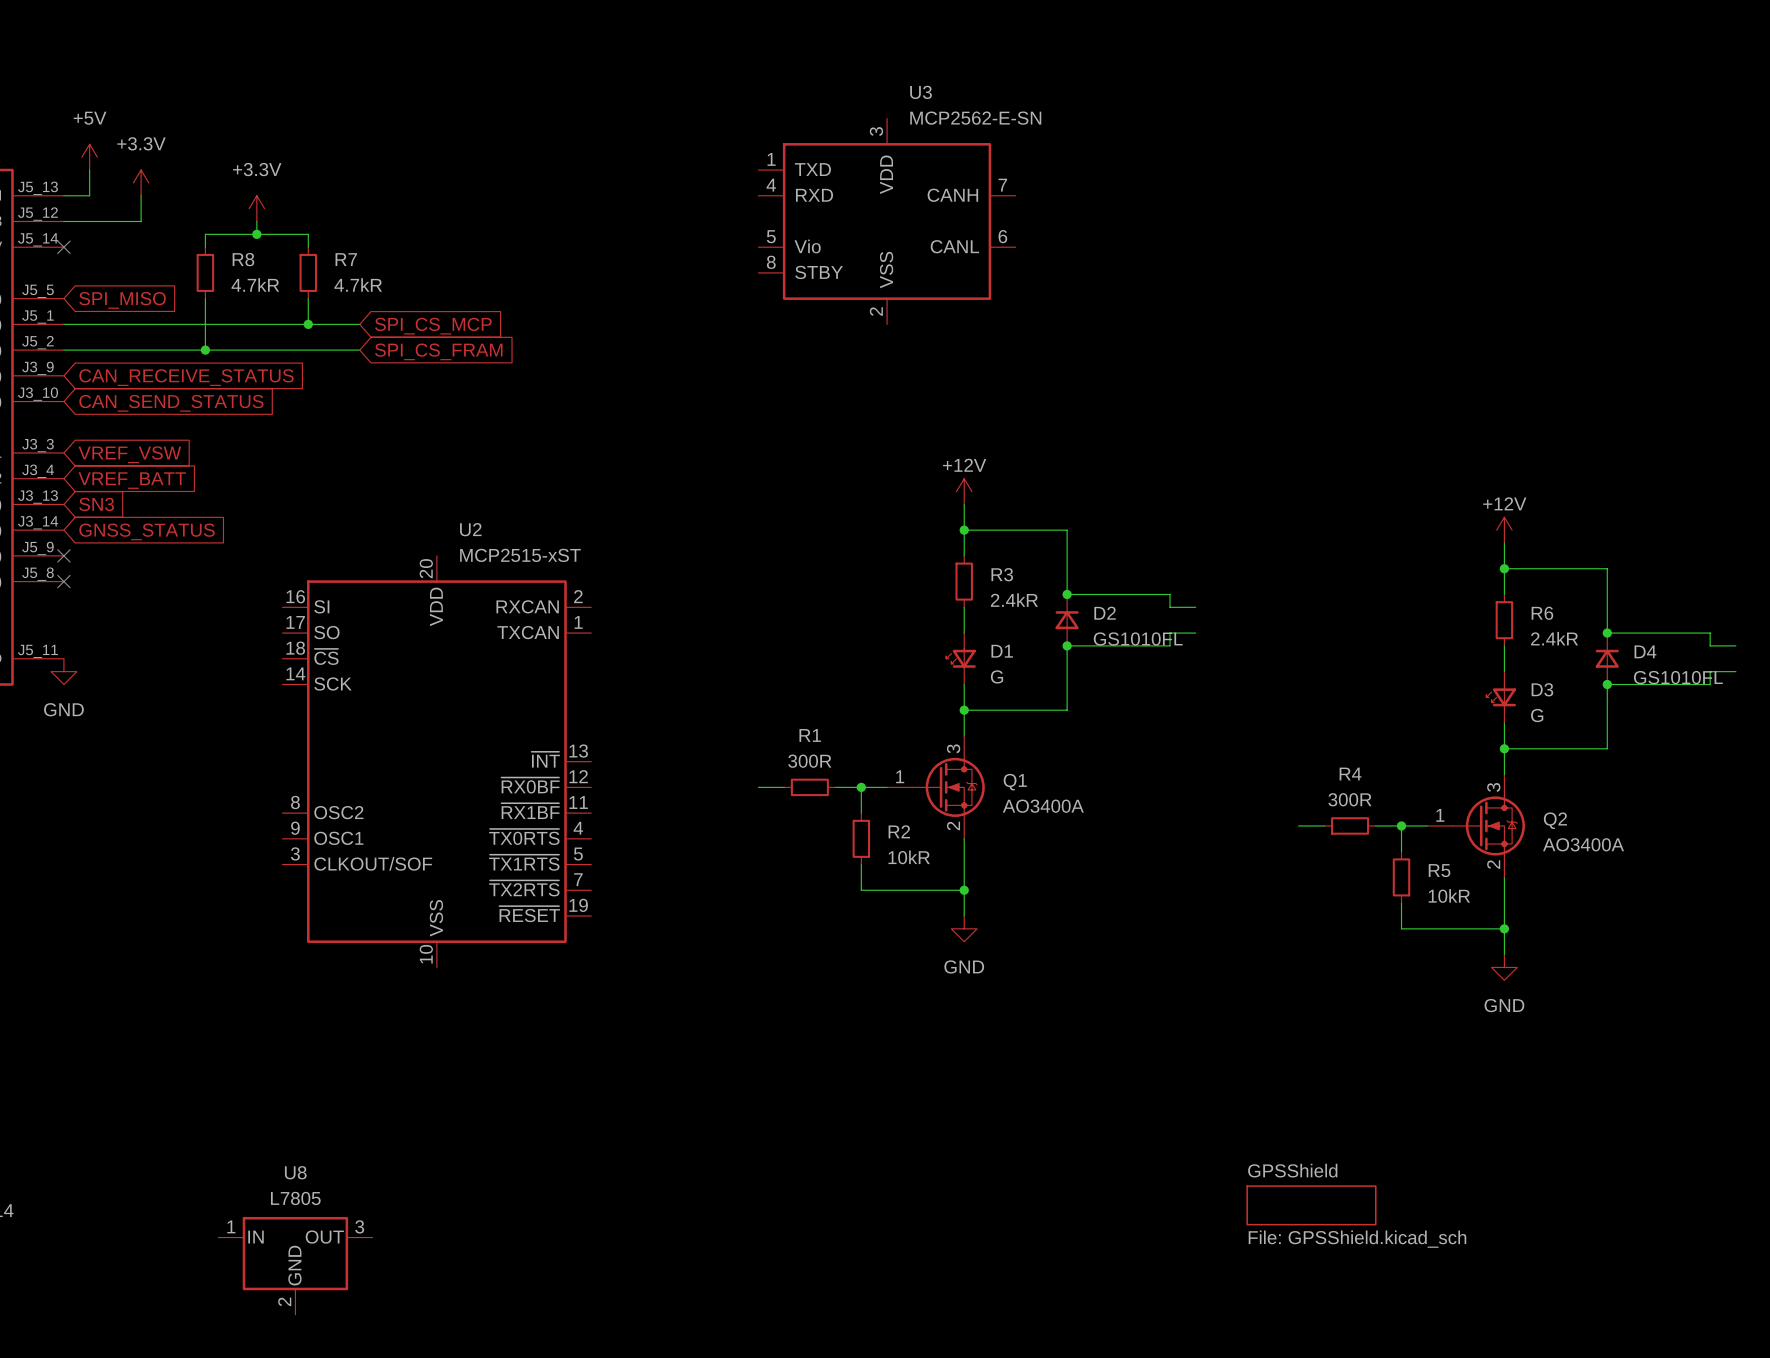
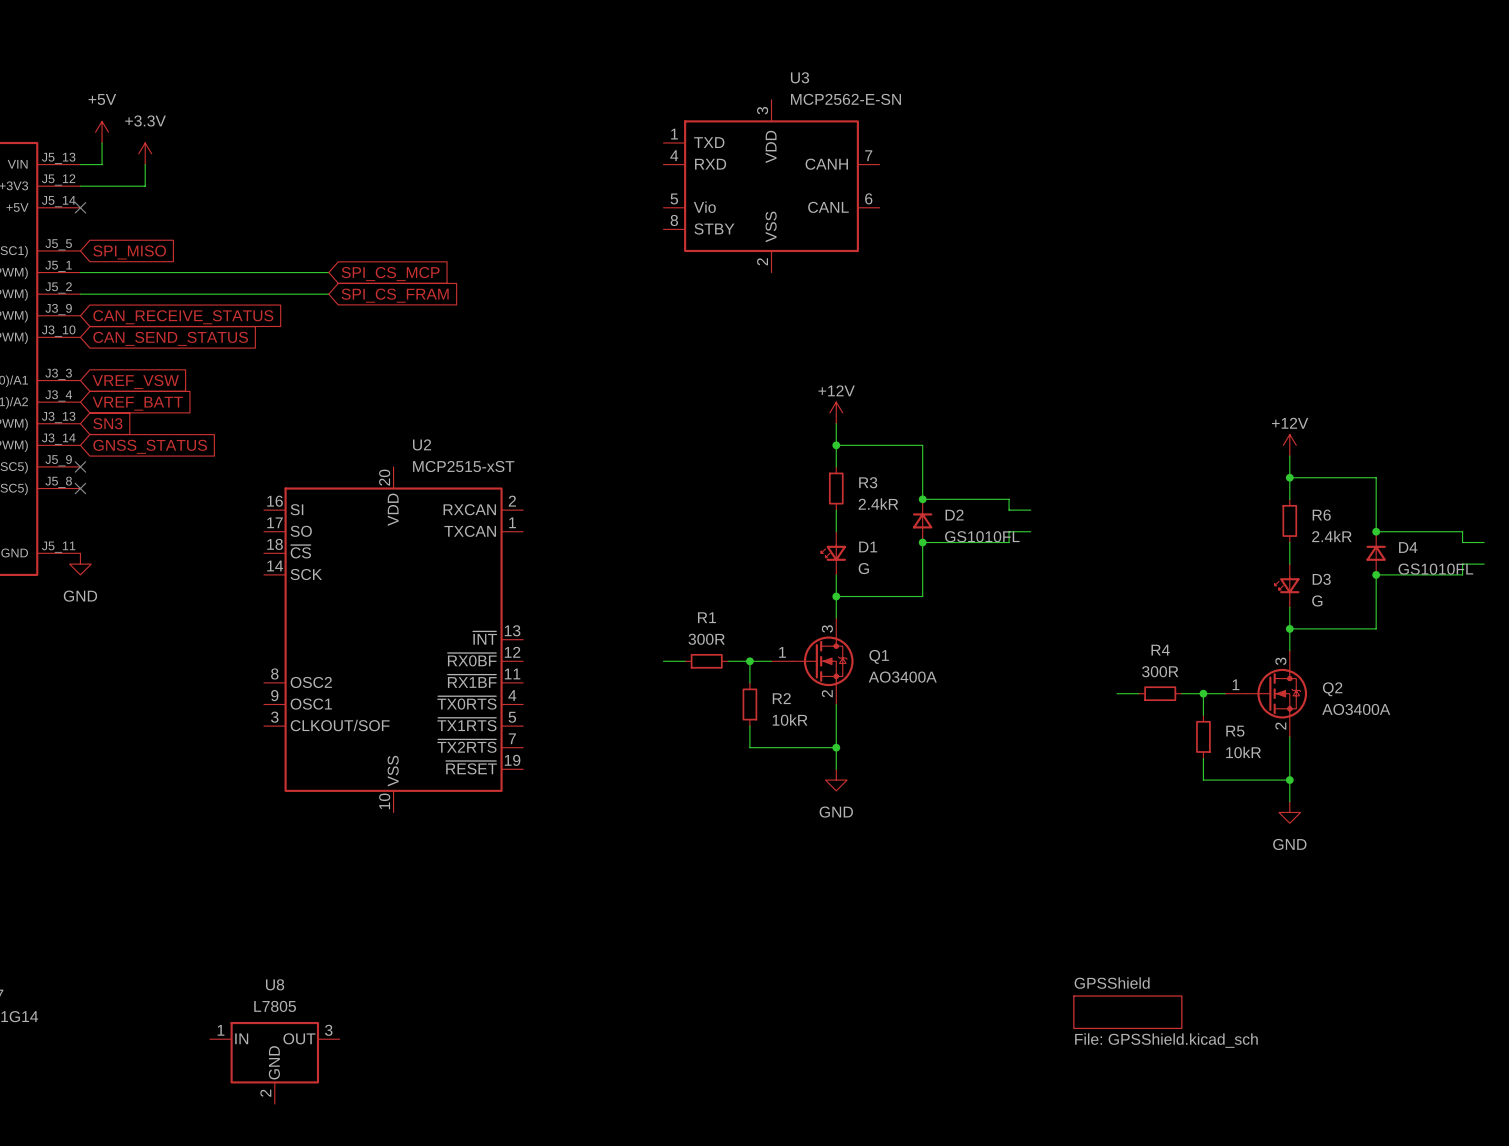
power symbol: +3.3V (256, 208) -> none
wire: (256, 221) (256, 234) -> none
junction: (256, 234) -> none
wire: (205, 247) (205, 234) (308, 234) (308, 247) -> none
R8: 4.7kR (205, 272) -> none
R7: 4.7kR (308, 272) -> none
wire: (205, 298) (205, 350) -> none
wire: (308, 298) (308, 324) -> none
junction: (308, 324) -> none
junction: (205, 350) -> none

